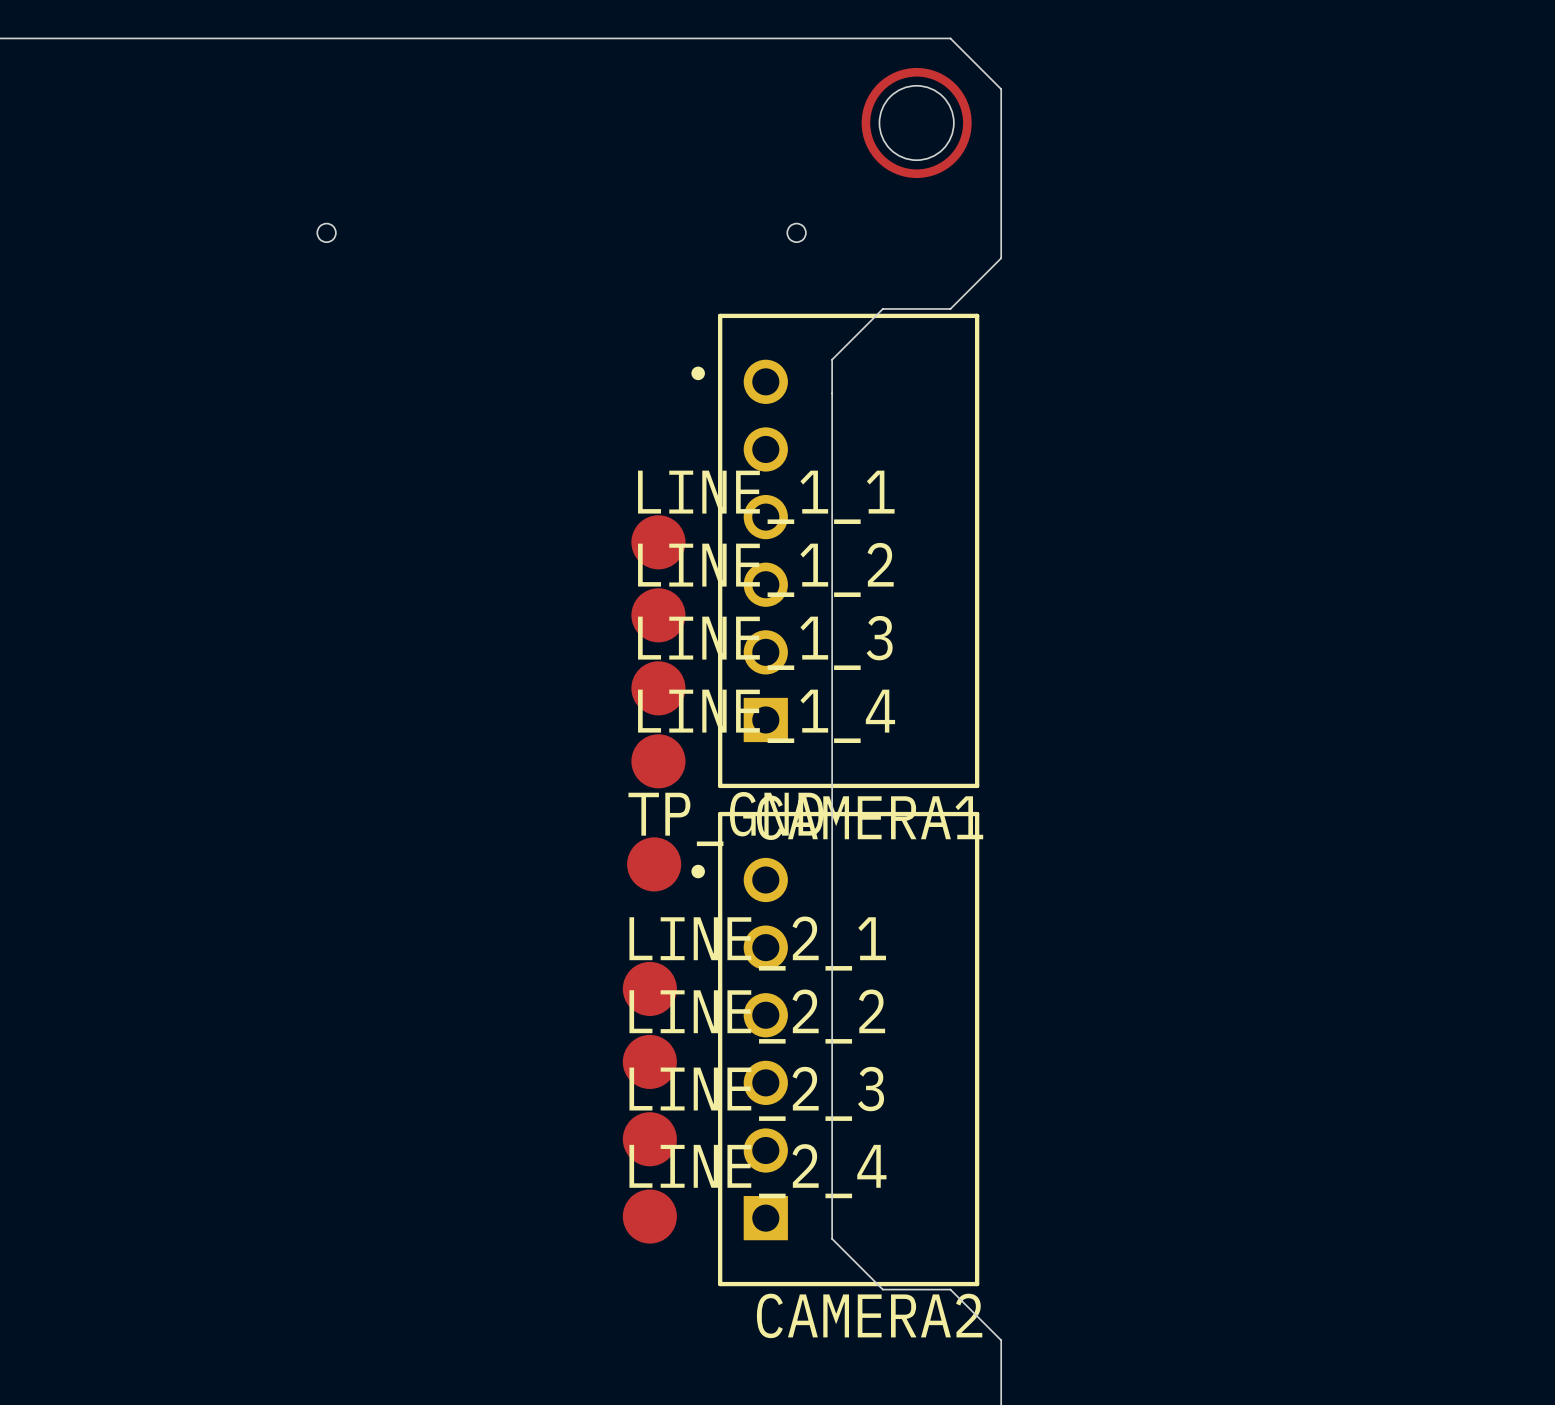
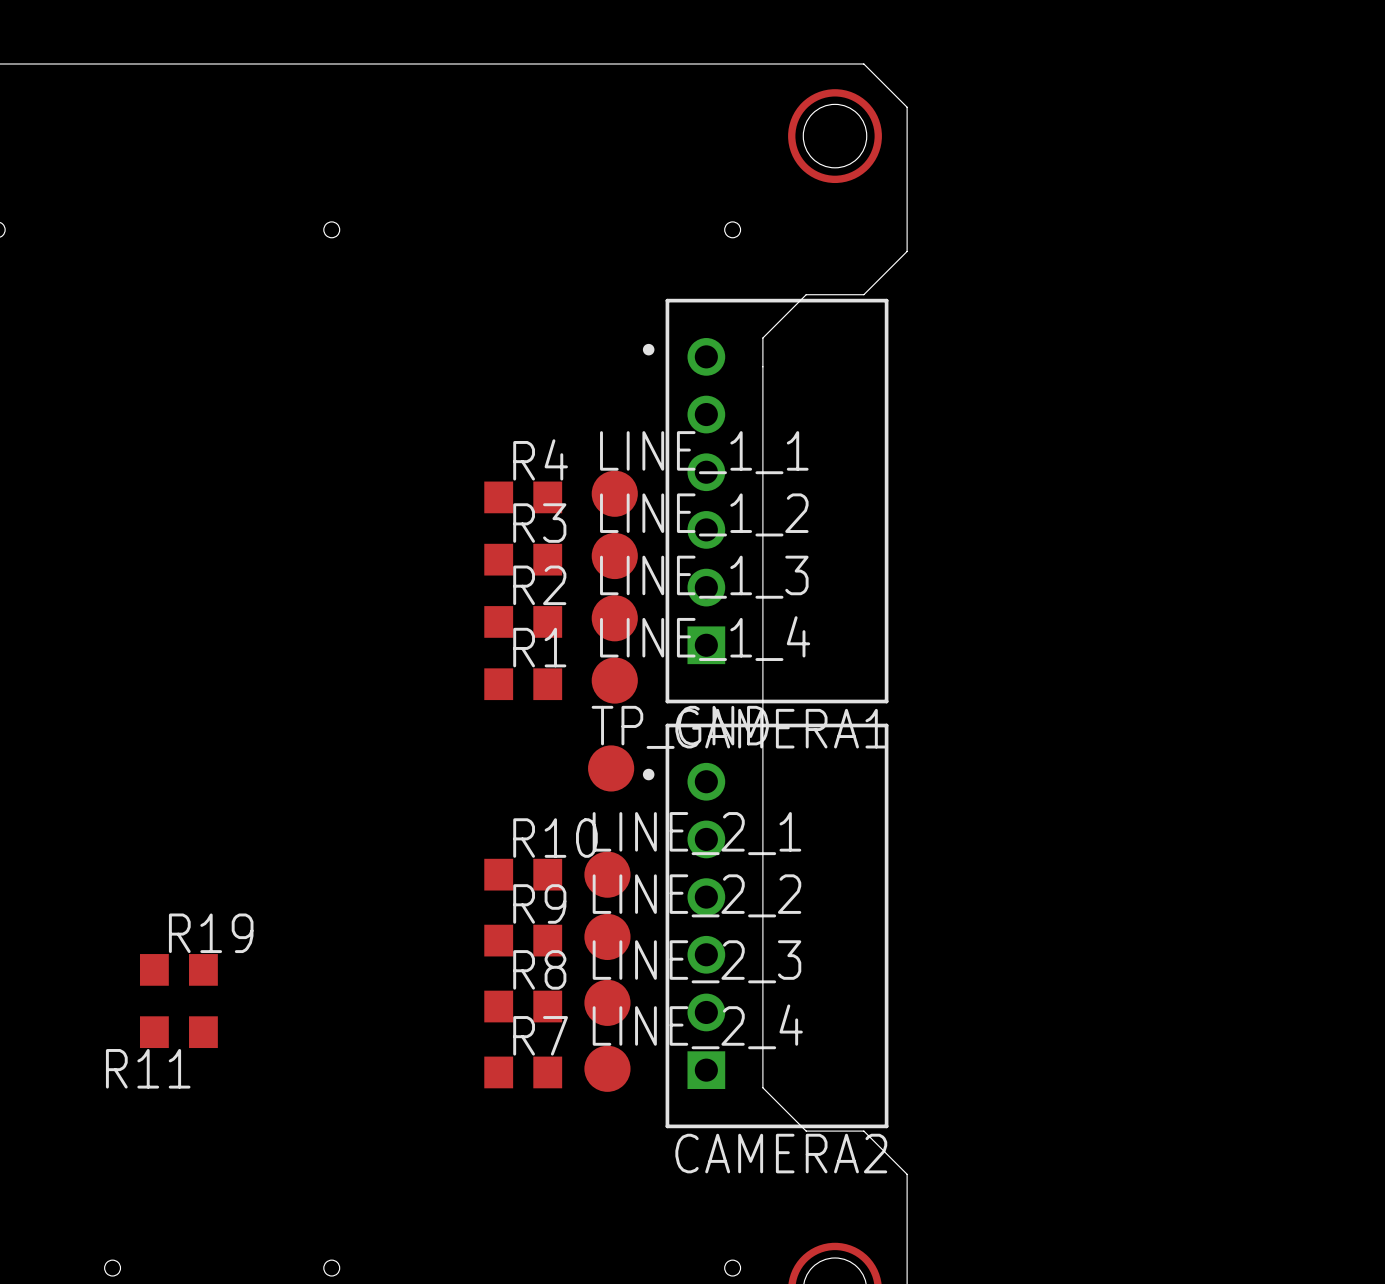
R4: none -> (523, 497)
R3: none -> (523, 559)
R2: none -> (523, 621)
R1: none -> (523, 684)
R10: none -> (523, 874)
R9: none -> (523, 940)
R19: none -> (178, 969)
R8: none -> (523, 1006)
R11: none -> (178, 1032)
R7: none -> (523, 1072)

